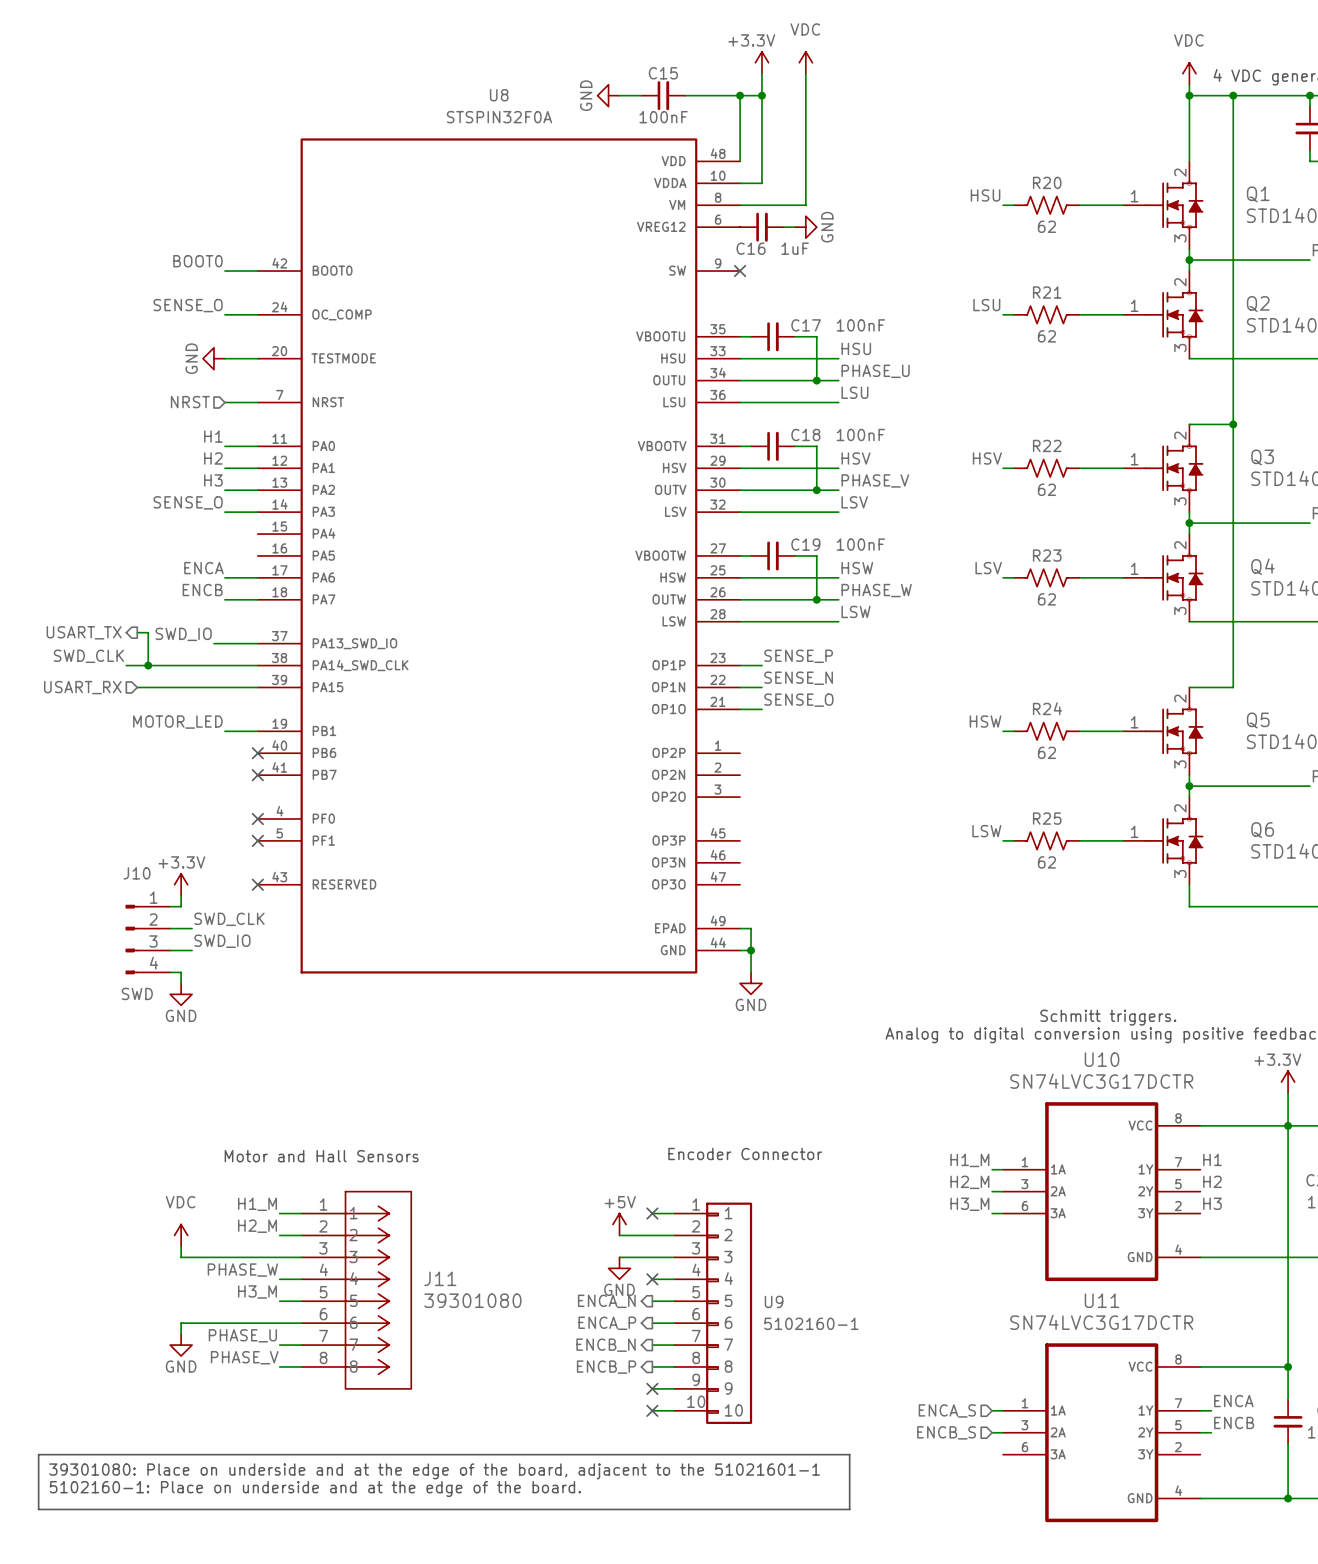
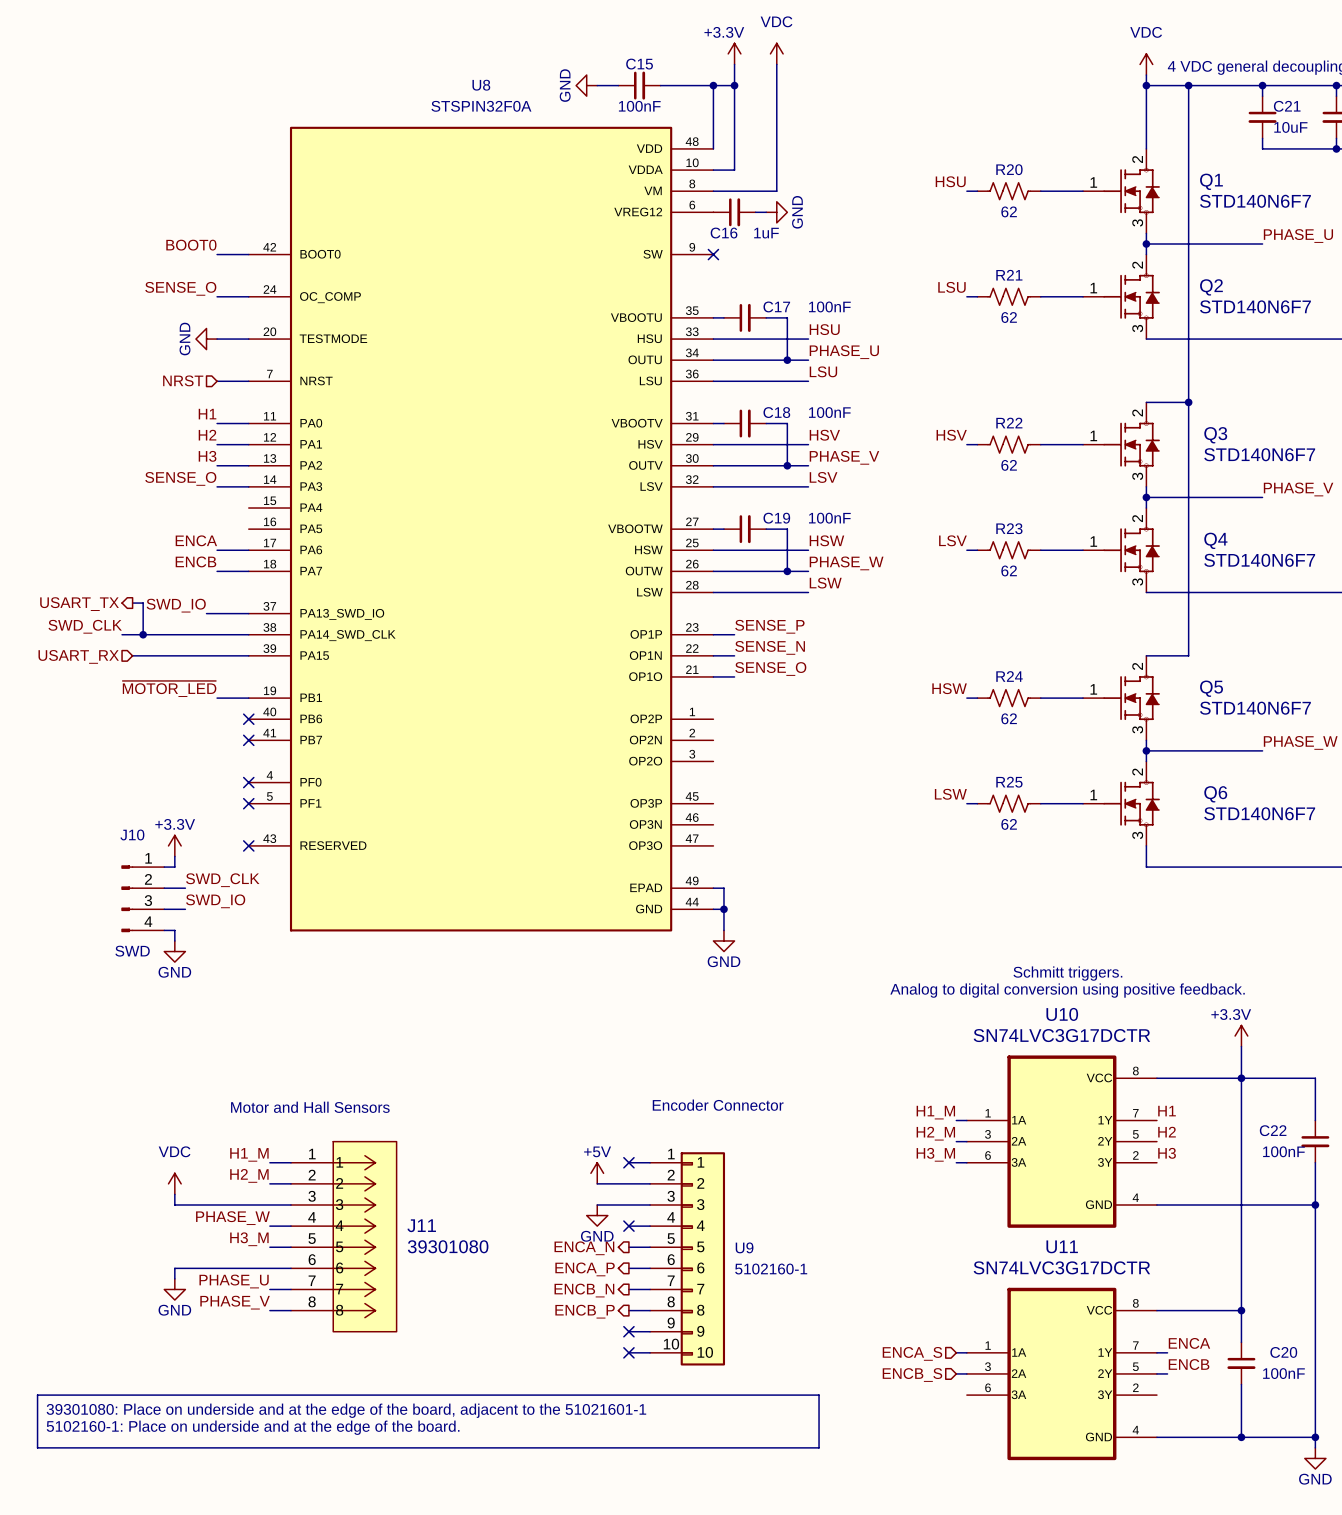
label: MOTOR_LED (177, 722) -> ~{MOTOR_LED} (169, 688)

